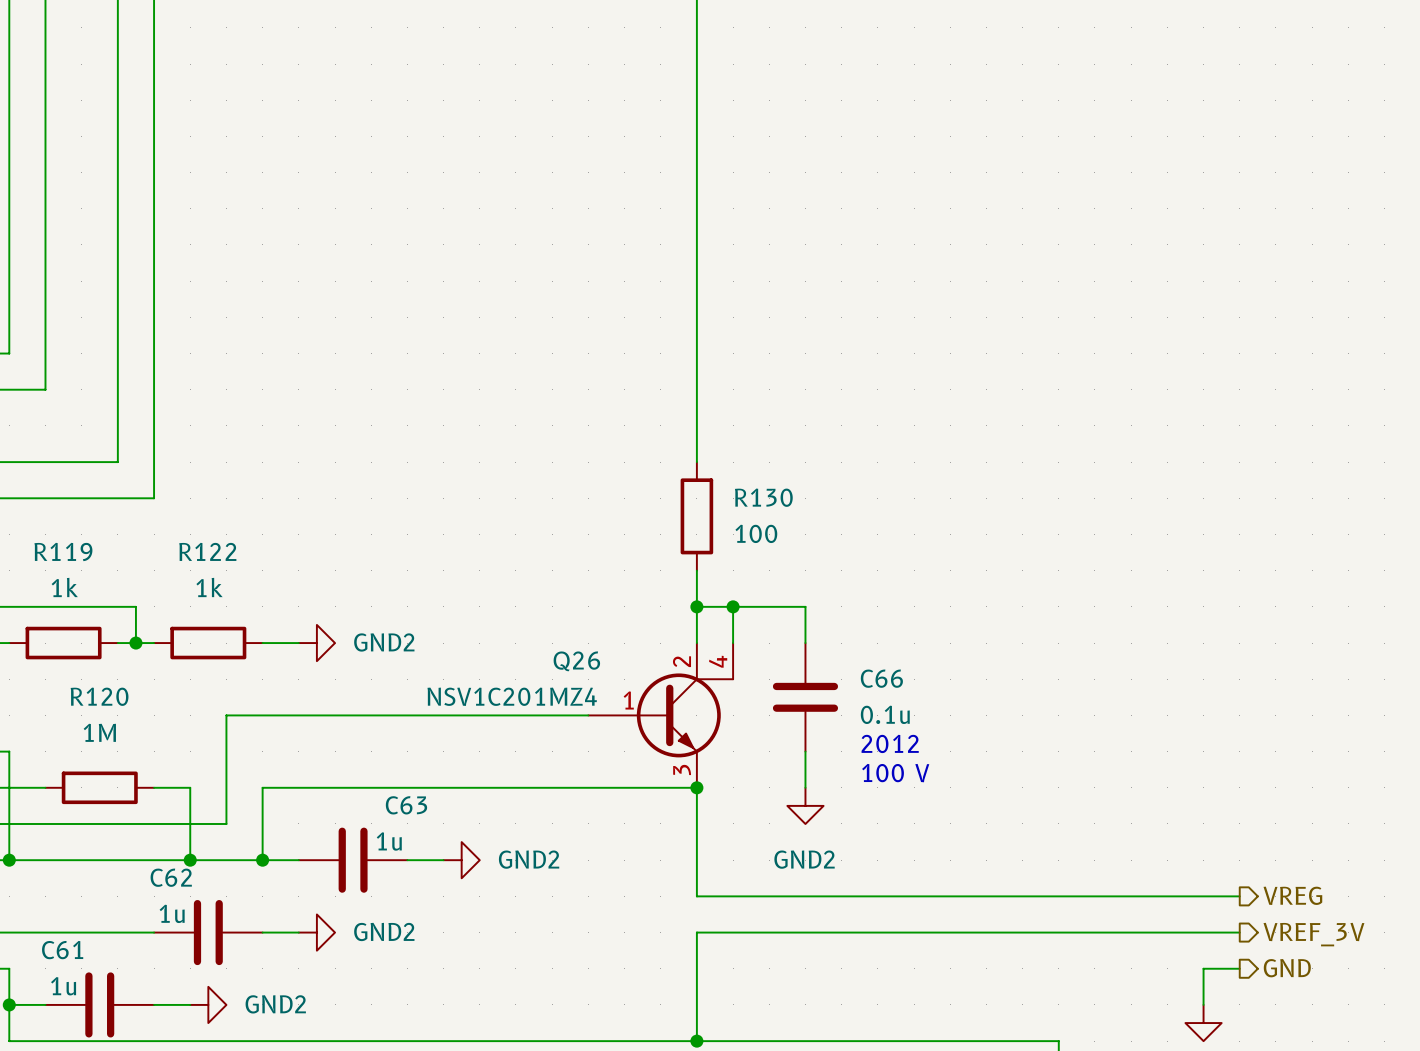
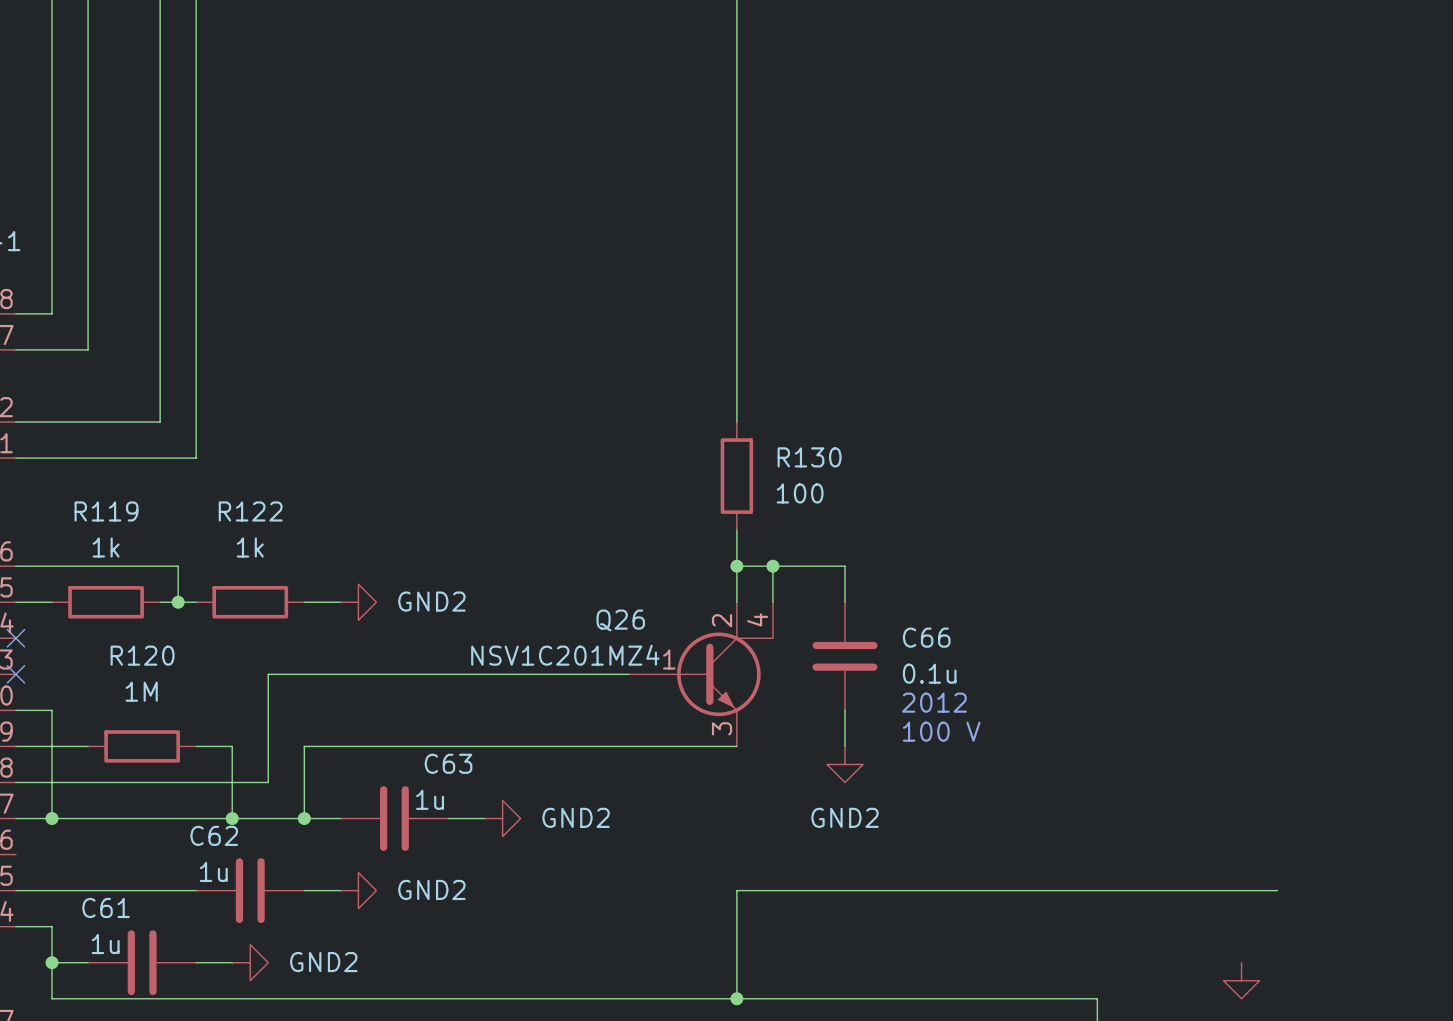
wire: (696, 787) (696, 896) (1239, 896) -> none
junction: (696, 787) -> none
hierarchical label: VREG (1292, 895) -> none
hierarchical label: VREF_3V (1313, 934) -> none
wire: (1239, 968) (1203, 968) (1203, 1004) -> none
hierarchical label: GND (1287, 968) -> none

